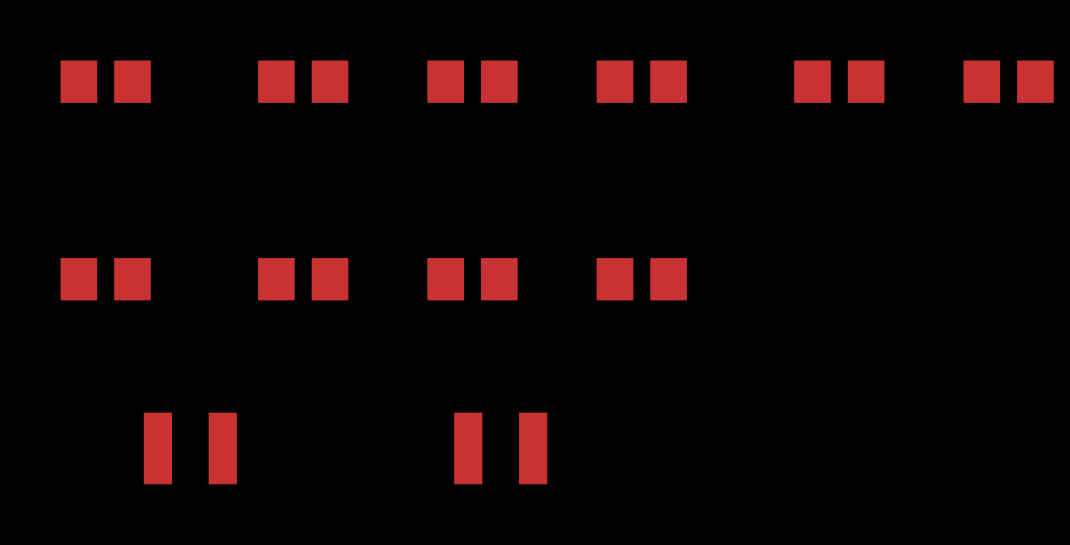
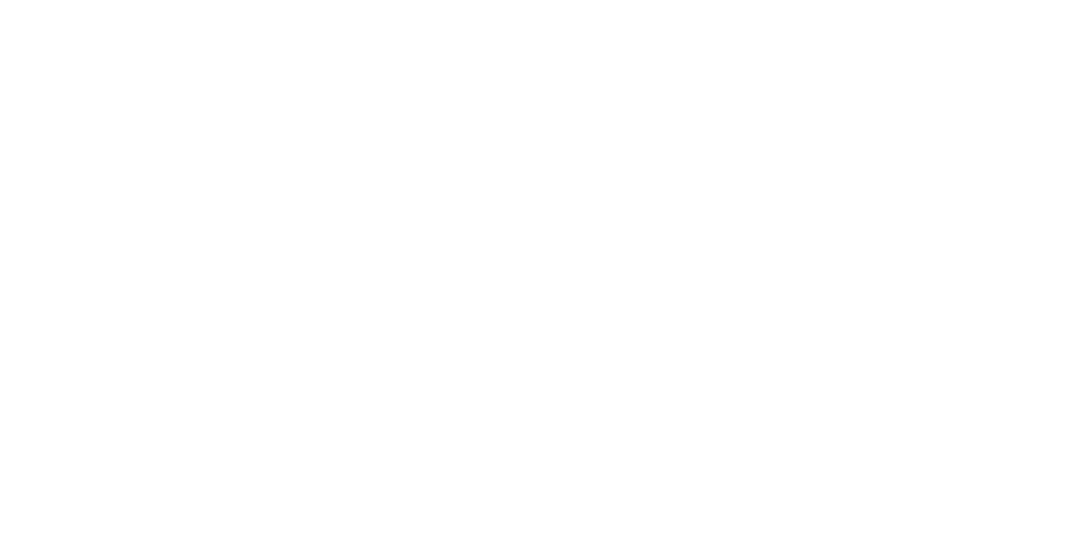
part: (105, 81) -> none
part: (303, 81) -> none
part: (472, 81) -> none
part: (641, 81) -> none
part: (839, 81) -> none
part: (1008, 81) -> none
part: (105, 279) -> none
part: (303, 279) -> none
part: (472, 279) -> none
part: (641, 279) -> none
part: (190, 448) -> none
part: (500, 448) -> none

